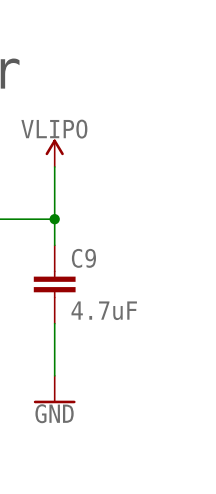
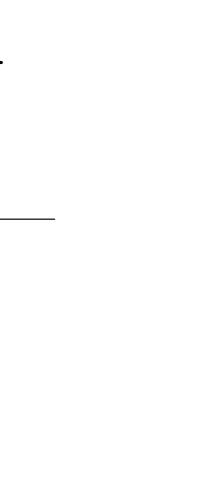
power symbol: VLIPO (54, 153) -> none
wire: (54, 166) (54, 245) -> none
junction: (54, 219) -> none
C9: 4.7uF (54, 284) -> none
wire: (54, 323) (54, 375) -> none
power symbol: GND (54, 389) -> none

